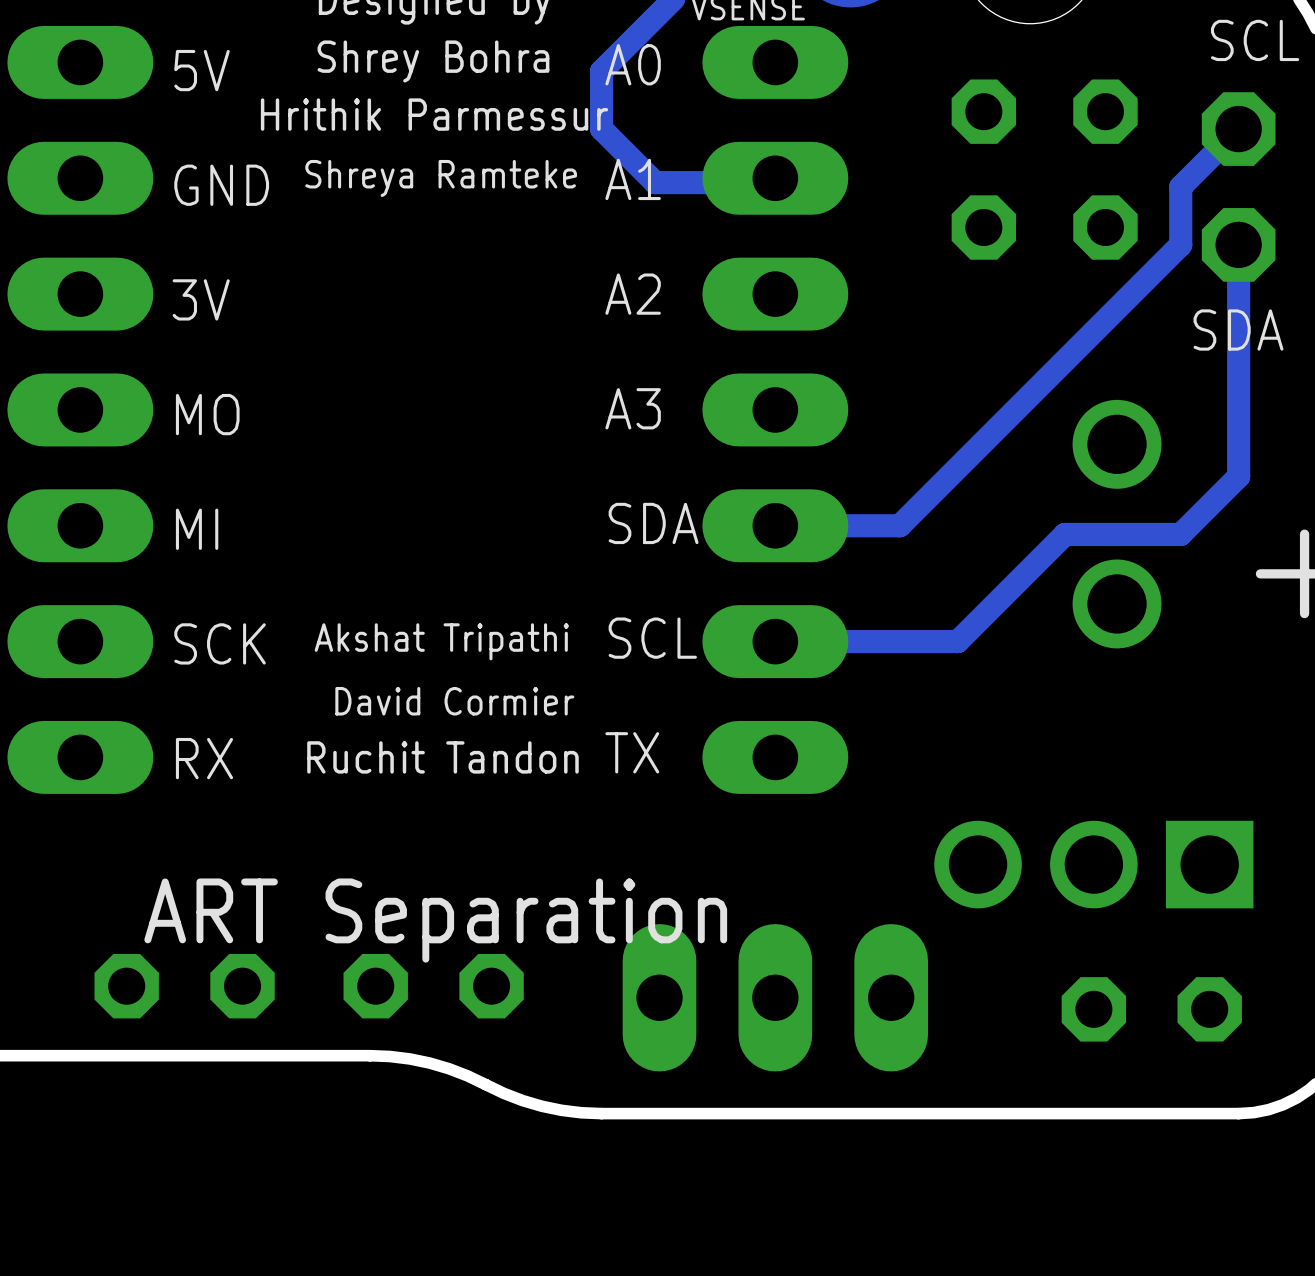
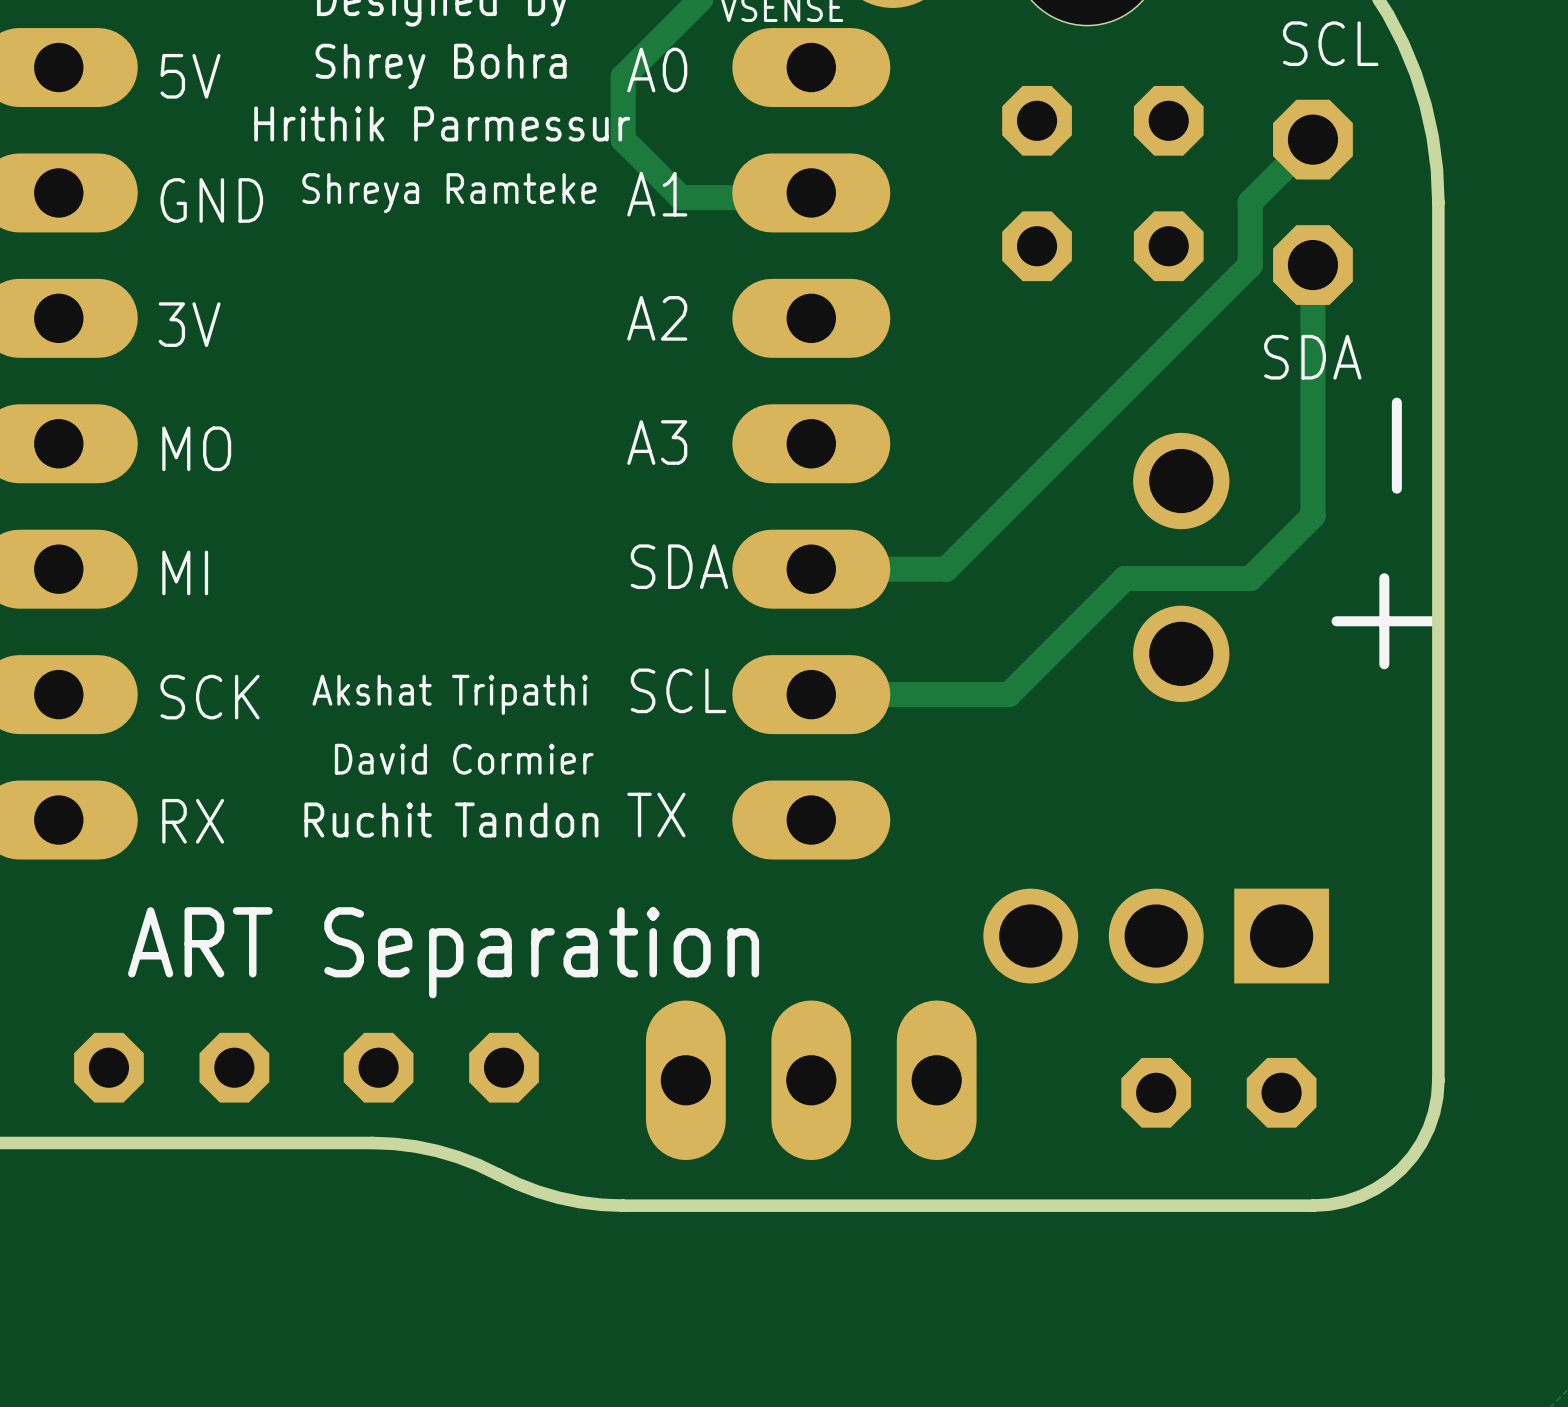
text position: ART Separation (435, 920) -> ART Separation (443, 952)

